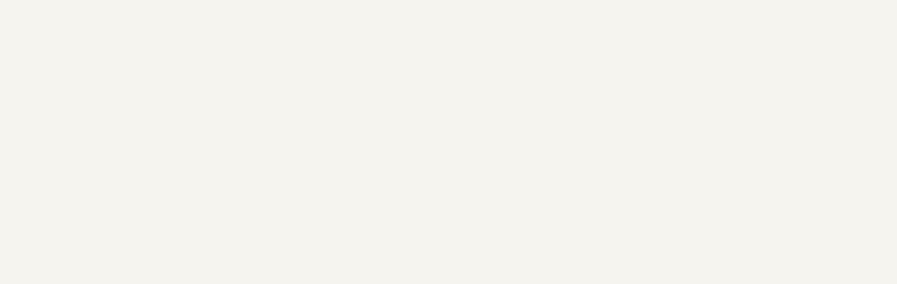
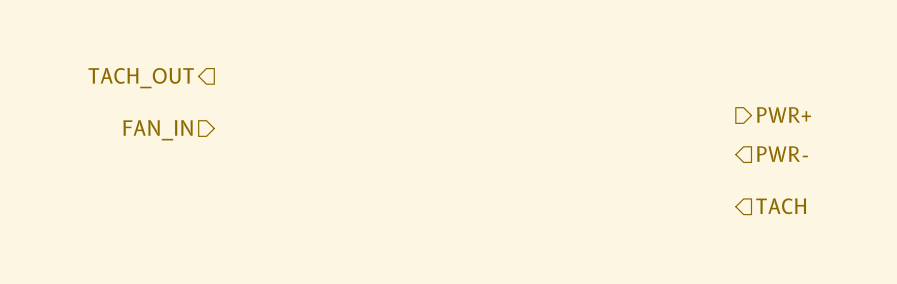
hierarchical label: none -> TACH_OUT (141, 78)
hierarchical label: none -> PWR+ (783, 114)
hierarchical label: none -> FAN_IN (157, 130)
hierarchical label: none -> PWR- (782, 154)
hierarchical label: none -> TACH (781, 206)

